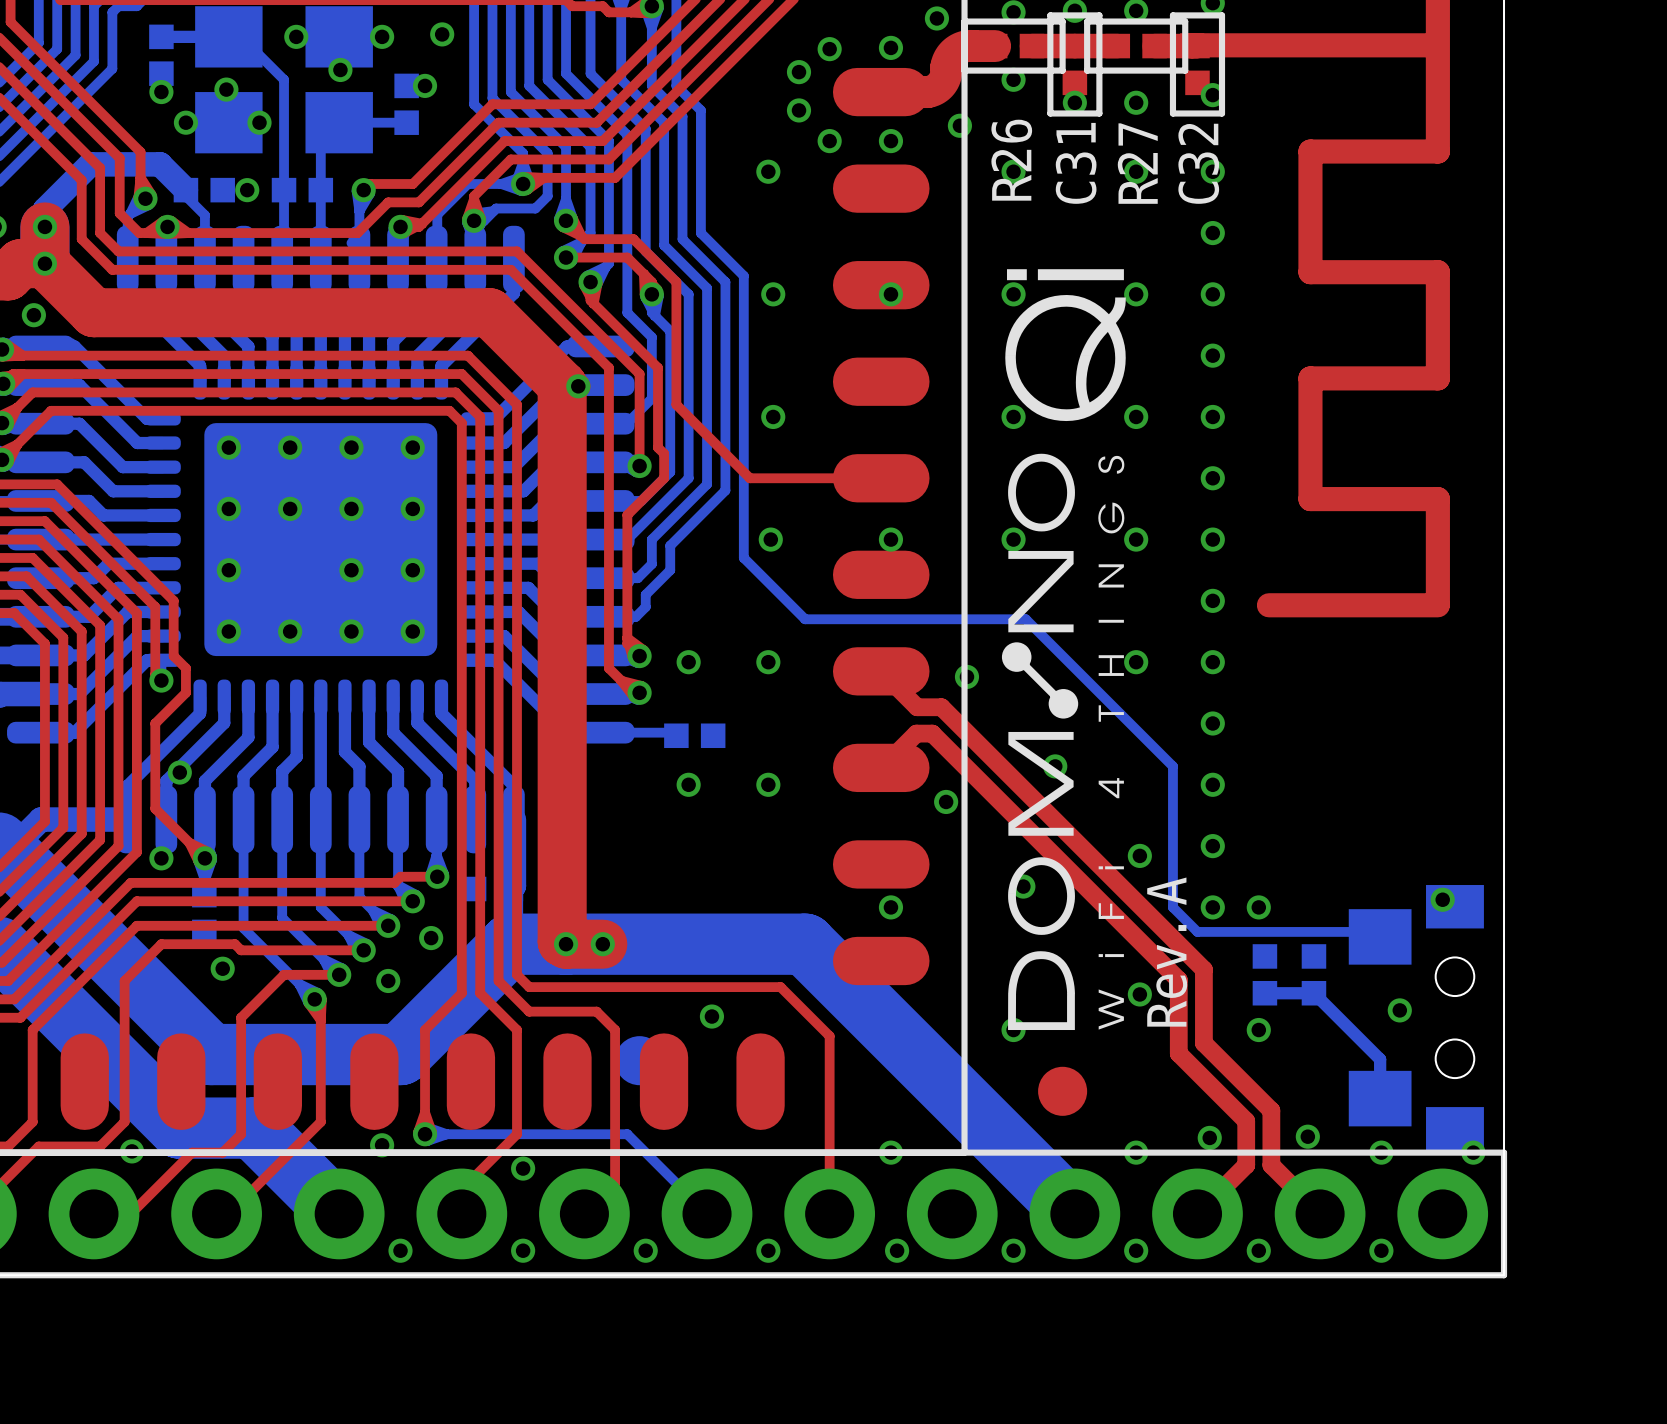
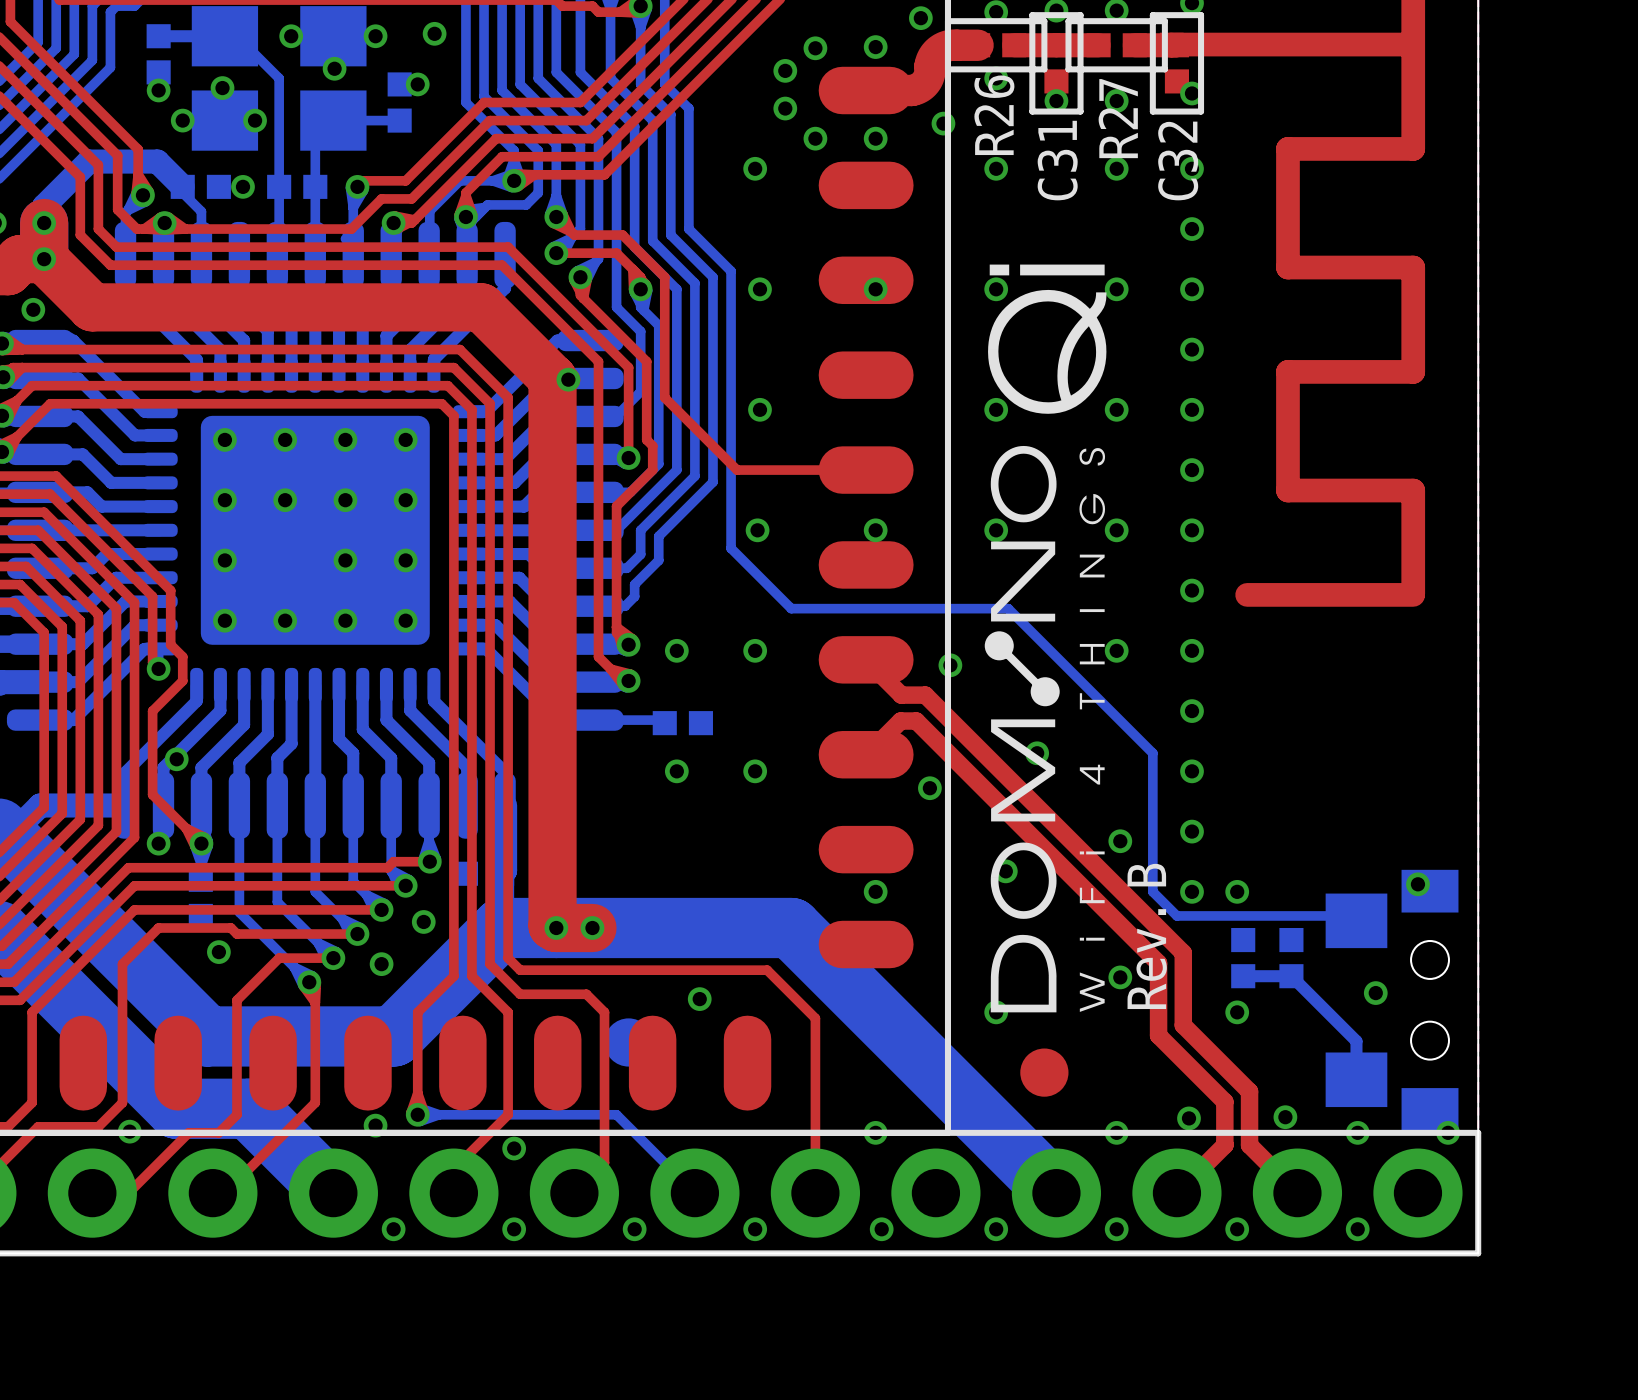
R26 name position: R26 (1011, 160) -> R26 (994, 115)
R27 name position: R27 (1137, 163) -> R27 (1118, 118)
text: A (1166, 891) -> B (1146, 875)

